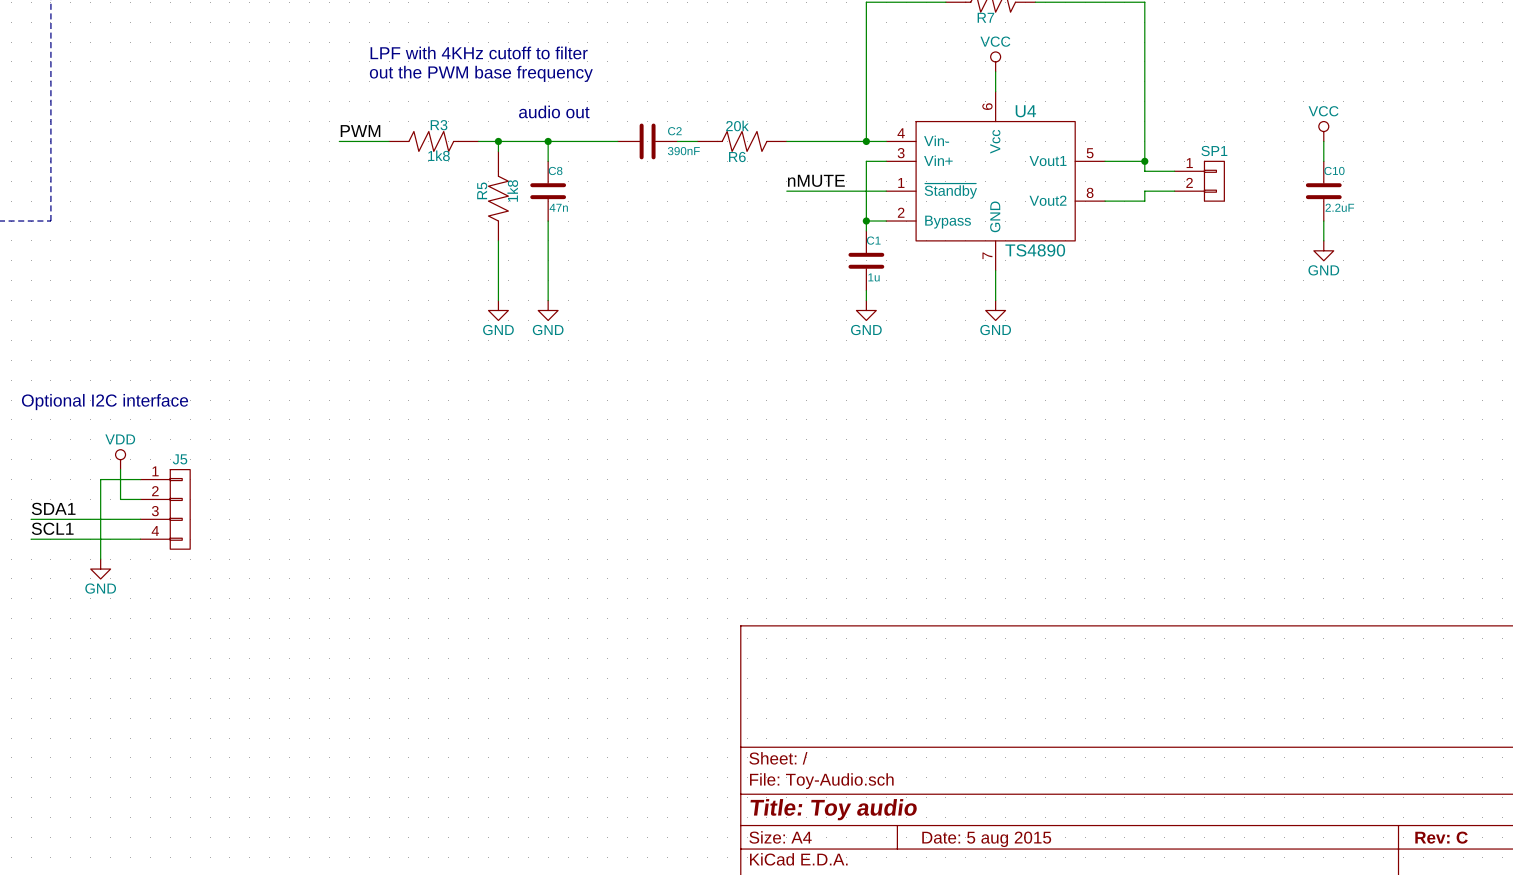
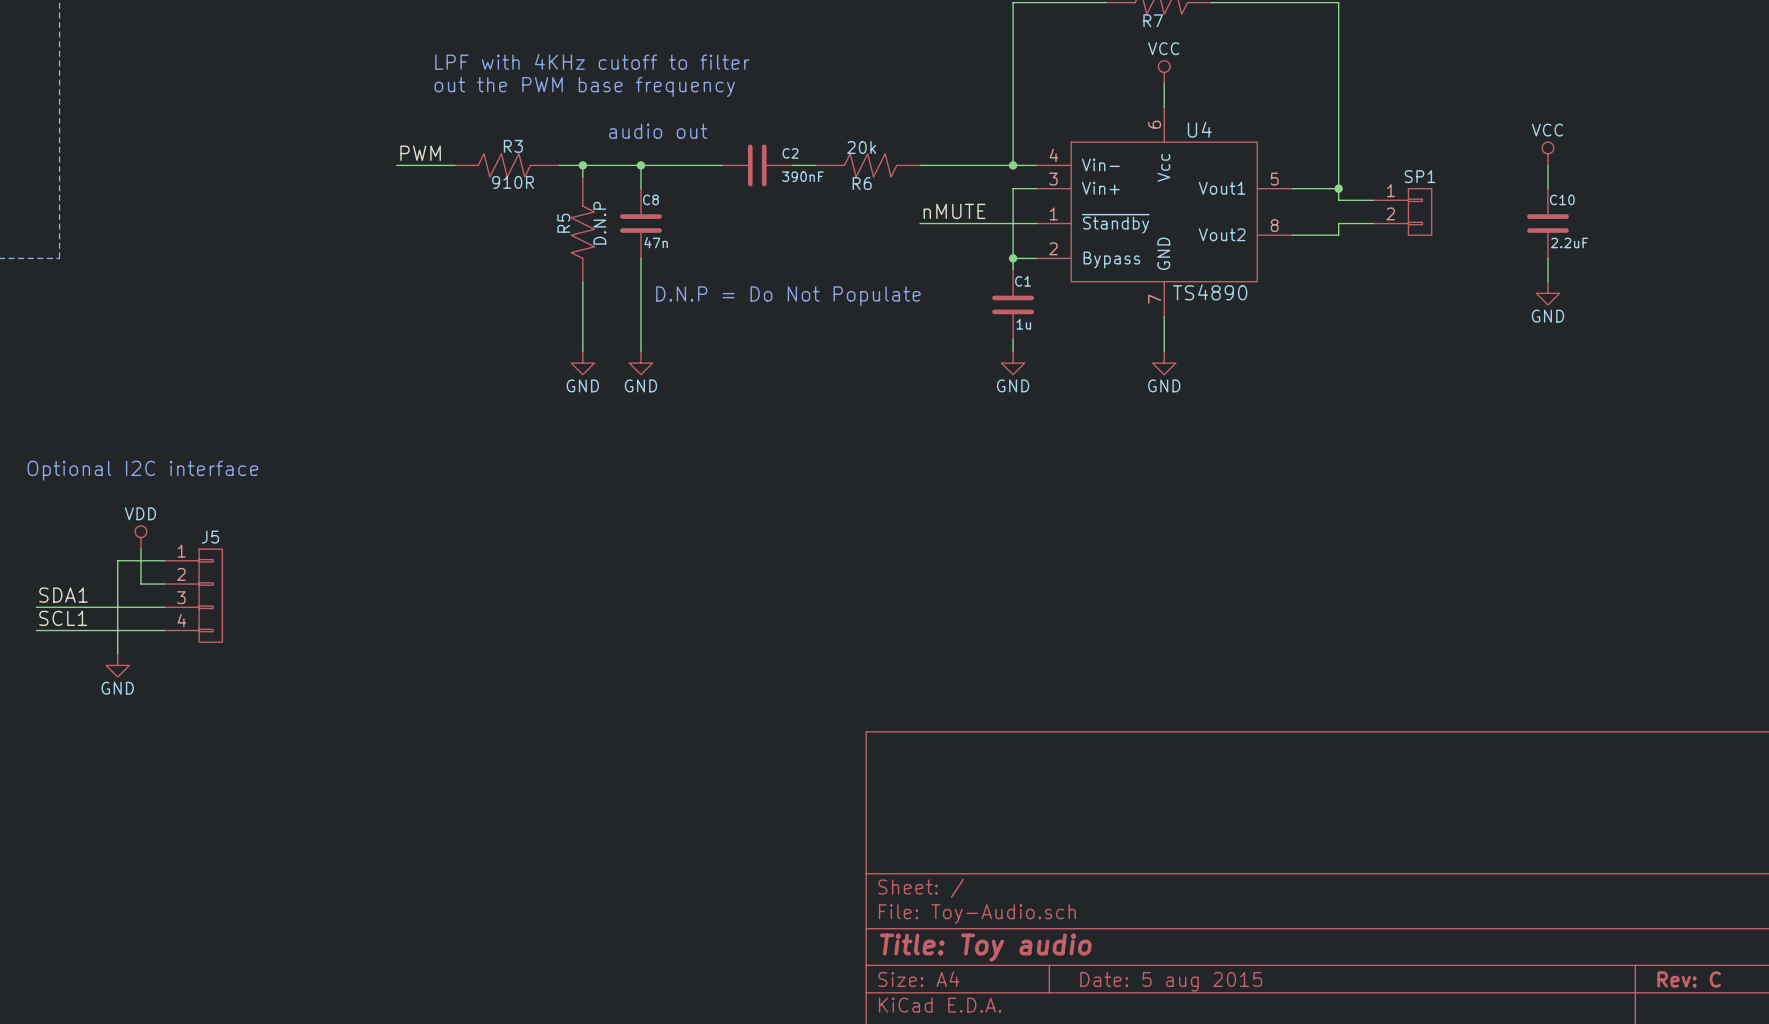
R3 value: 1k8 (439, 155) -> 910R (513, 182)
R5 value: 1k8 (512, 190) -> D.N.P (599, 223)
text: none -> D.N.P = Do Not Populate (788, 296)

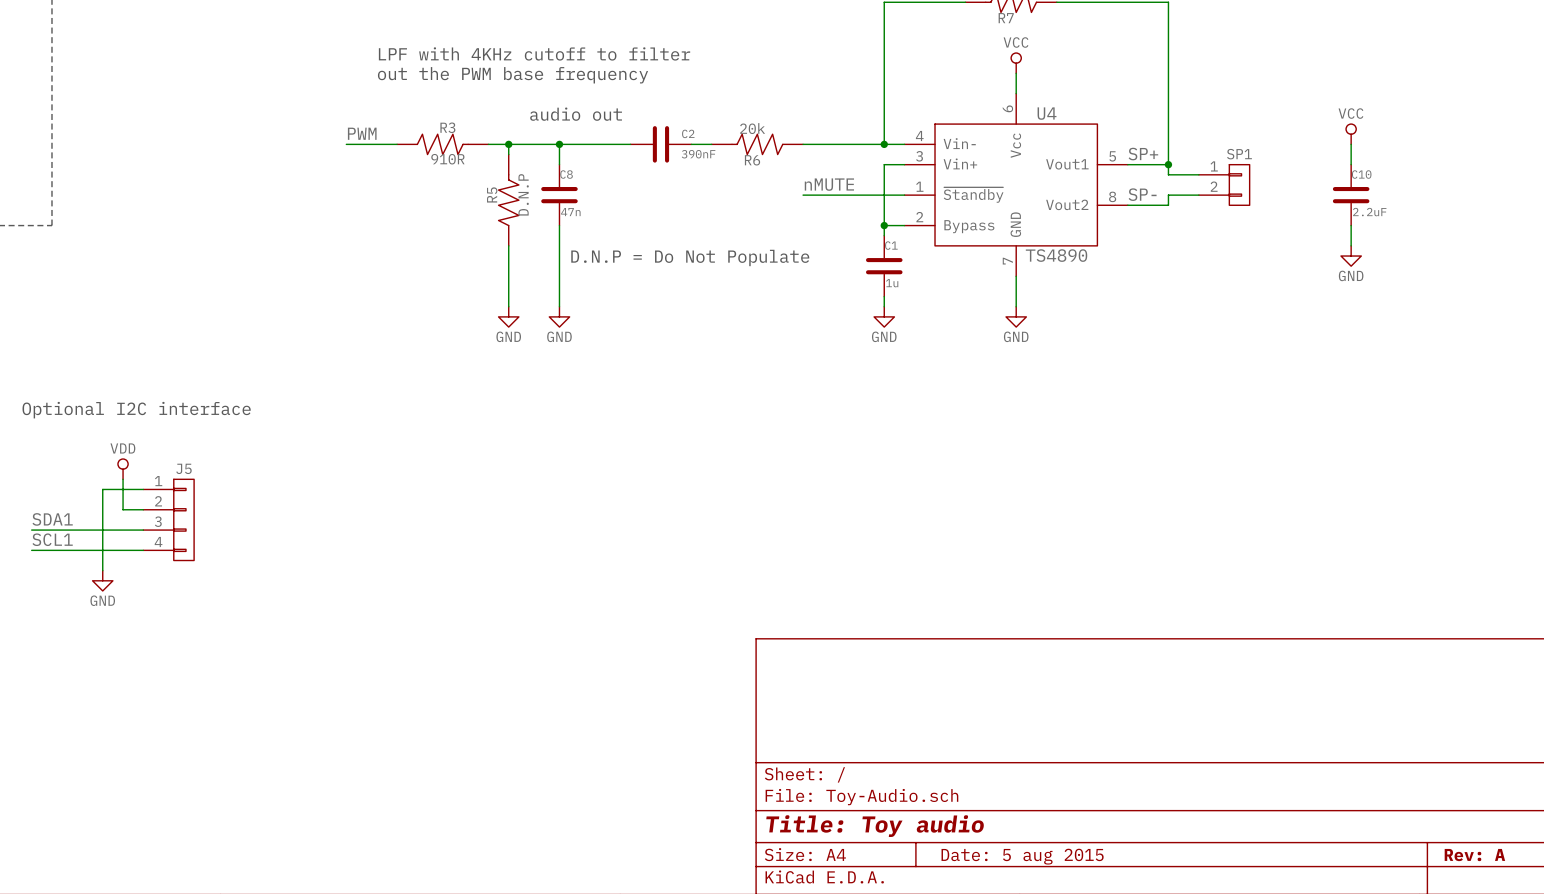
label: none -> SP+ (1143, 154)
label: none -> SP- (1142, 194)
title block: Rev: C (1689, 979) -> Rev: A (1474, 855)

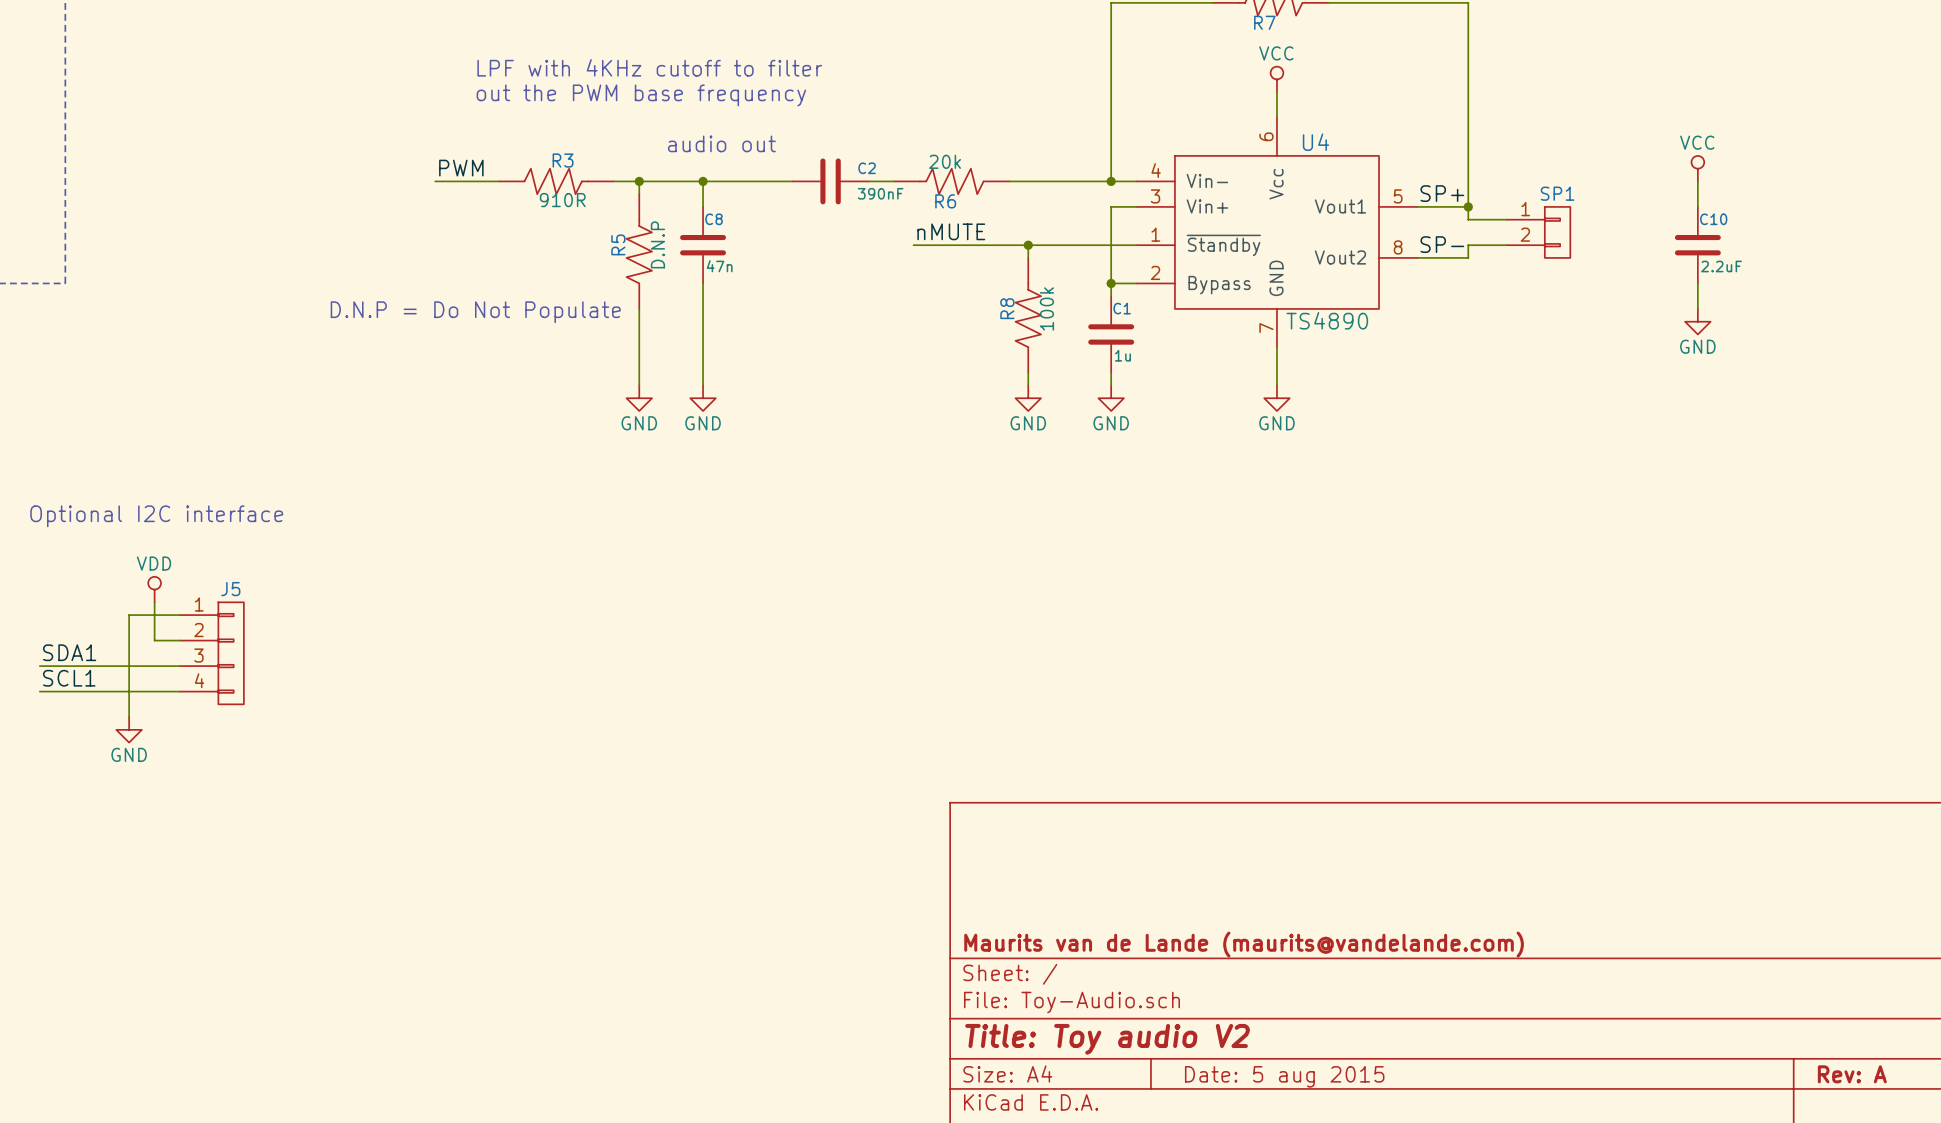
label position: nMUTE (829, 184) -> nMUTE (951, 231)
wire: none -> (913, 245) (1009, 245)
wire: none -> (1028, 245) (1028, 257)
junction: none -> (1028, 245)
text: none -> D.N.P = Do Not Populate (475, 312)
R8: none -> 100k (1028, 315)
text: D.N.P = Do Not Populate (690, 257) -> none
wire: none -> (1028, 372) (1028, 385)
power symbol: none -> GND (1028, 398)
title block: none -> Maurits van de Lande (maurits@vandelande.com) (1244, 944)
title block: Title: Toy audio (875, 826) -> Title: Toy audio V2 (1107, 1039)

